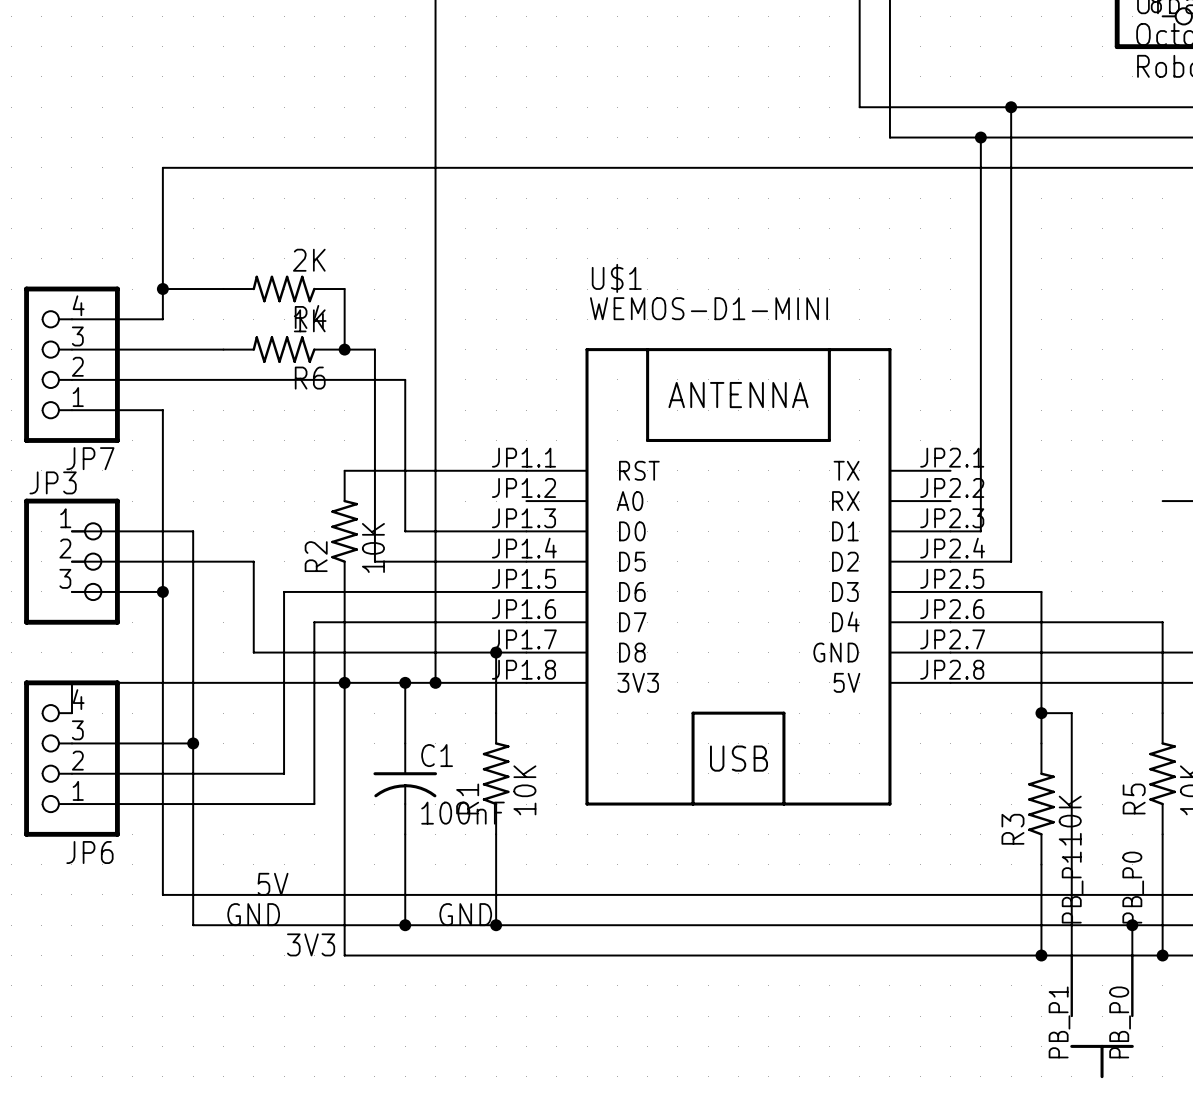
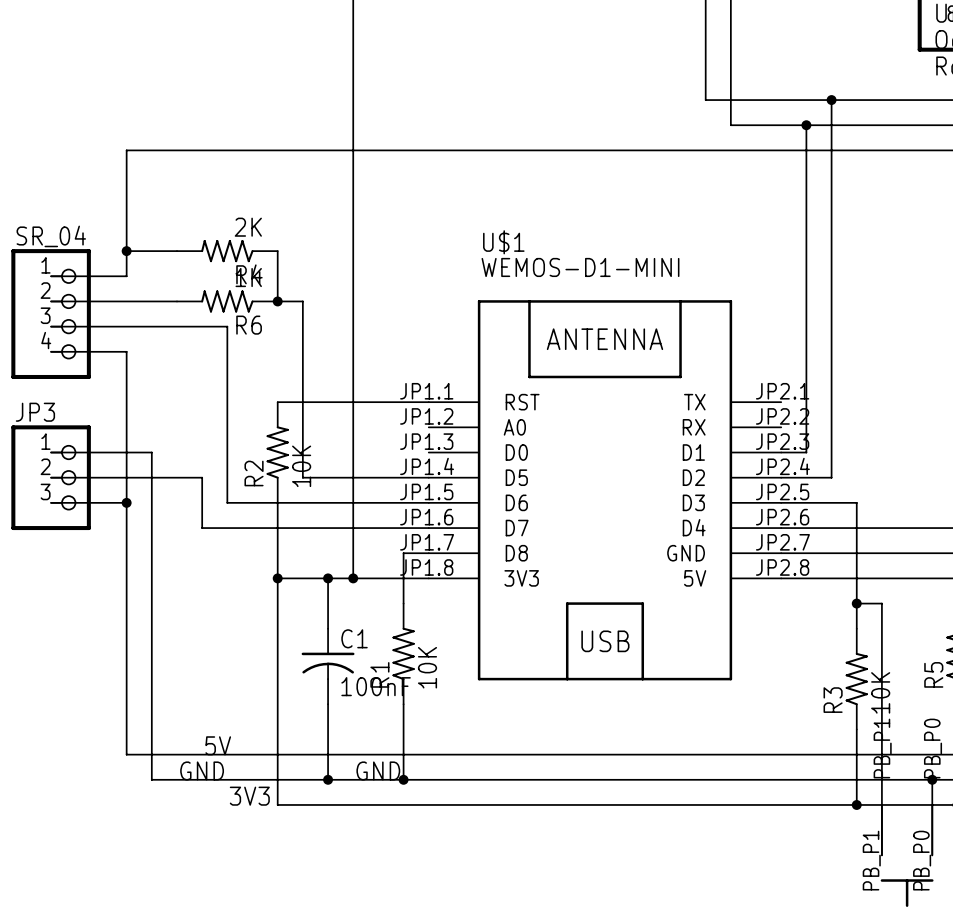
JP7: (71, 364) -> none
SR_04: none -> (51, 314)
wire: (284, 379) (405, 379) (405, 531) (526, 531) -> (227, 326) (227, 502)
wire: (284, 591) (284, 773) (71, 773) -> none
wire: (253, 622) (253, 652) (496, 652) -> (202, 528) (252, 528)
wire: (314, 622) (314, 804) (71, 804) -> none
junction: (496, 652) -> none
wire: (344, 682) (71, 682) (71, 713) -> none
wire: (71, 743) (193, 743) -> none
junction: (193, 743) -> none
JP6: (71, 758) -> none

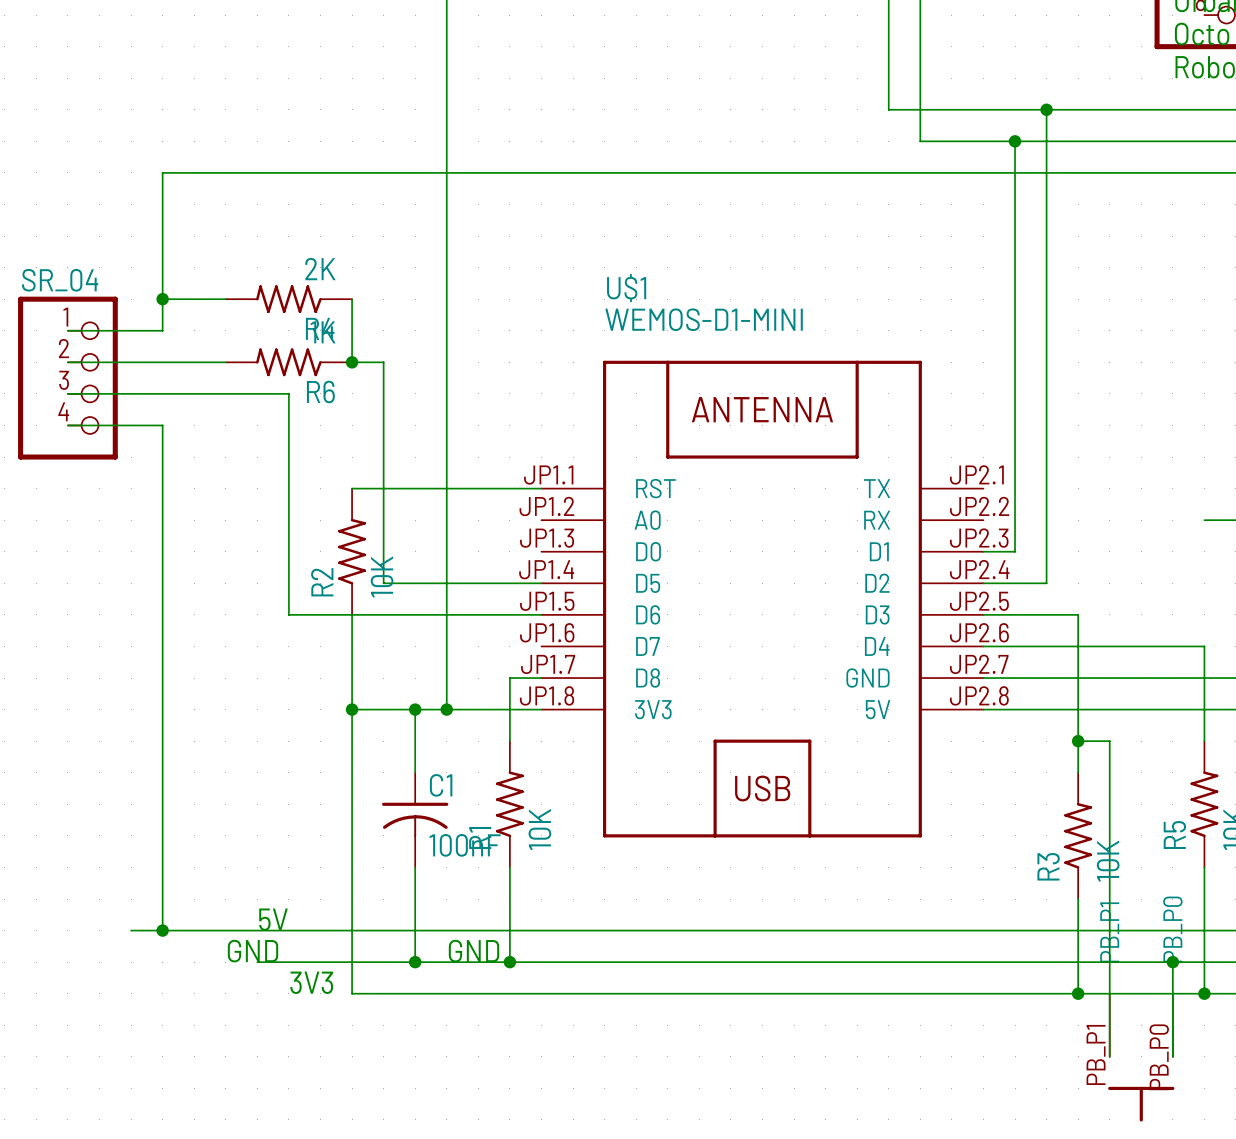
wire: (51, 452) (151, 452) (151, 779) (202, 779) -> none
wire: (51, 477) (202, 477) (202, 528) (428, 528) -> none
JP3: (51, 477) -> none
wire: (51, 502) (126, 502) -> none
junction: (126, 502) -> none
wire: none -> (131, 930) (162, 930)
junction: none -> (162, 930)

